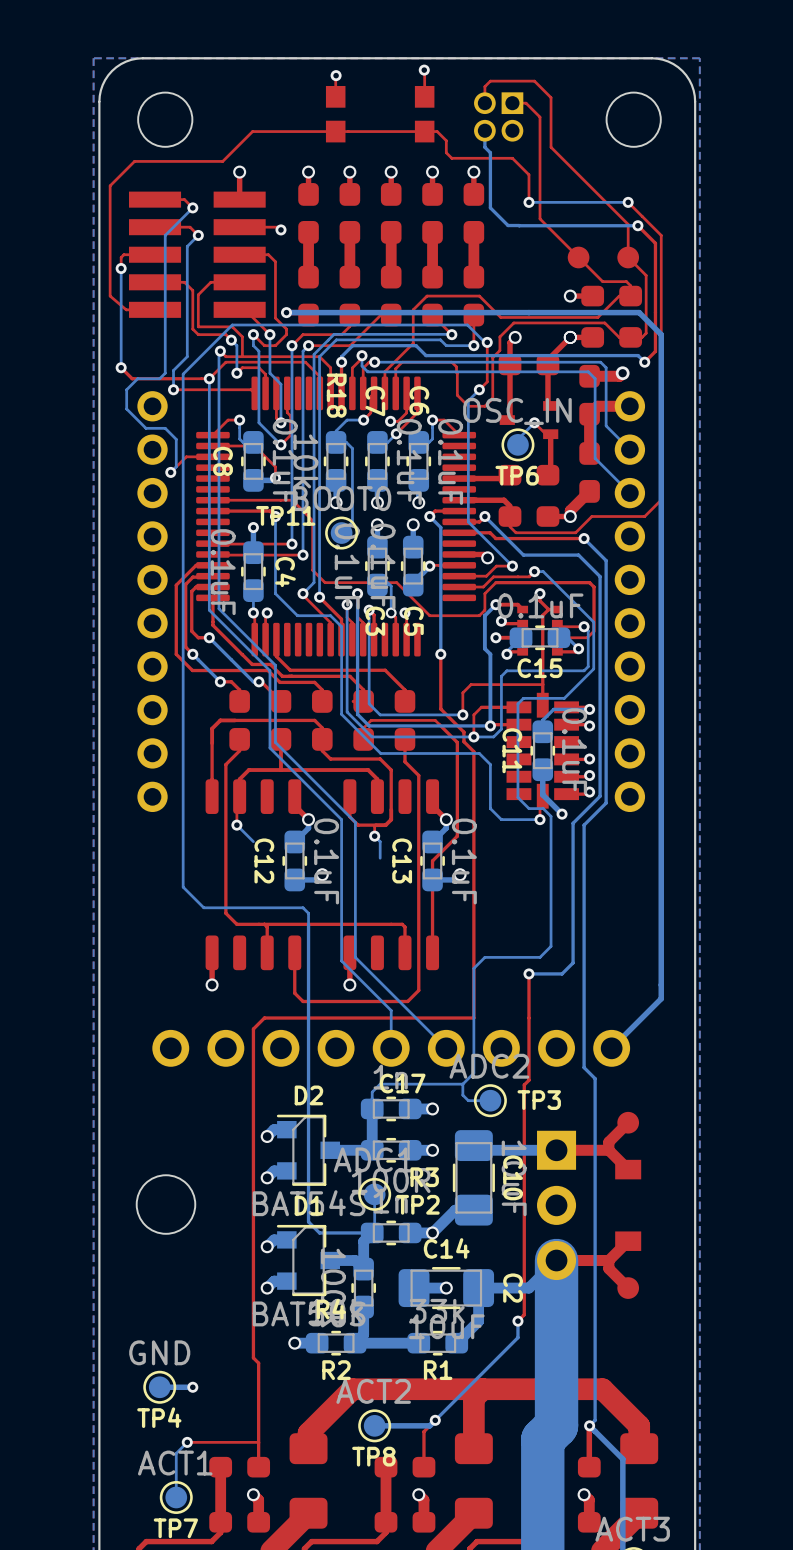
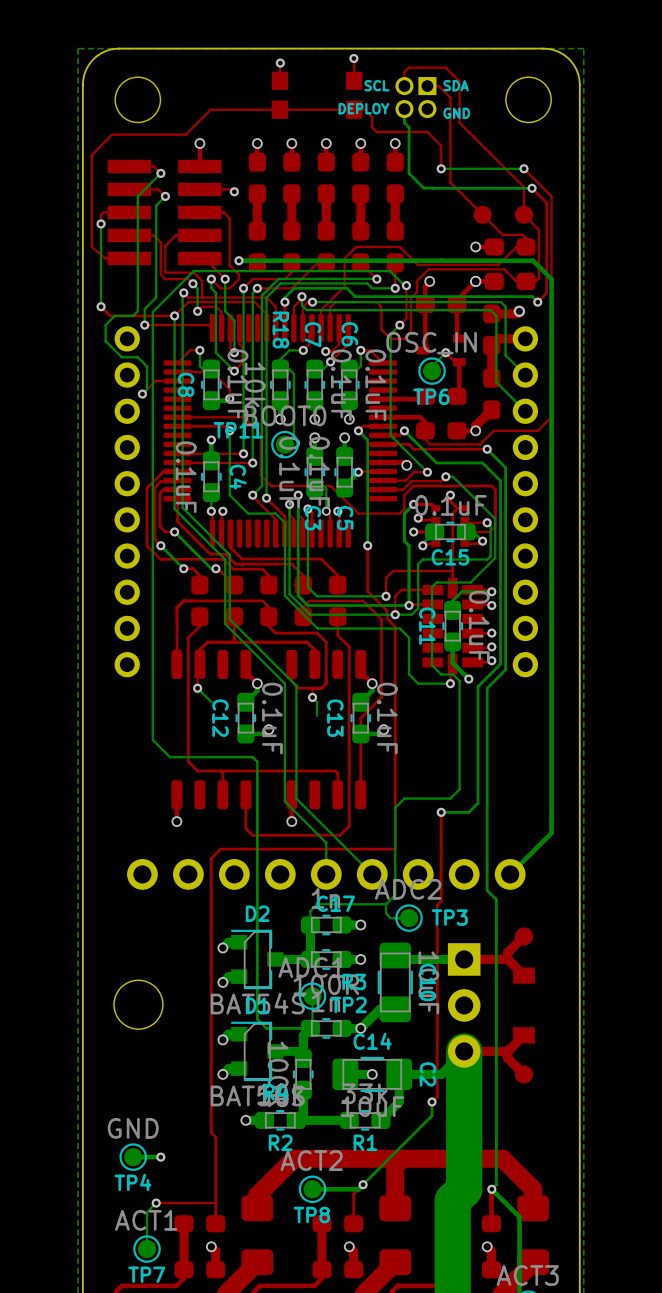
text: none -> SCL (376, 85)
text: none -> SDA (456, 85)
text: none -> DEPLOY (363, 108)
text: none -> GND (456, 113)

